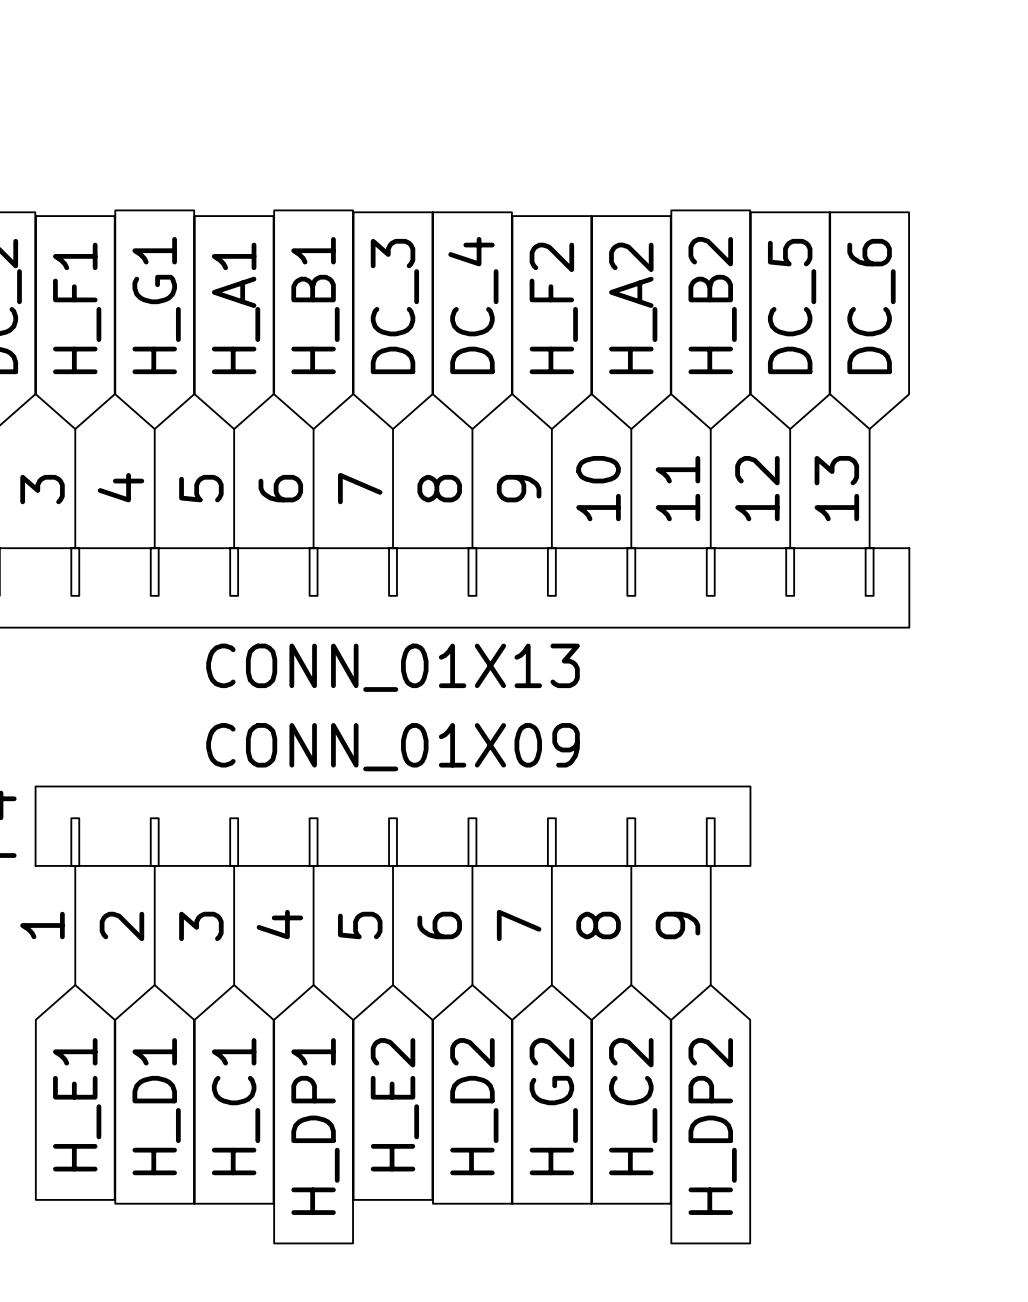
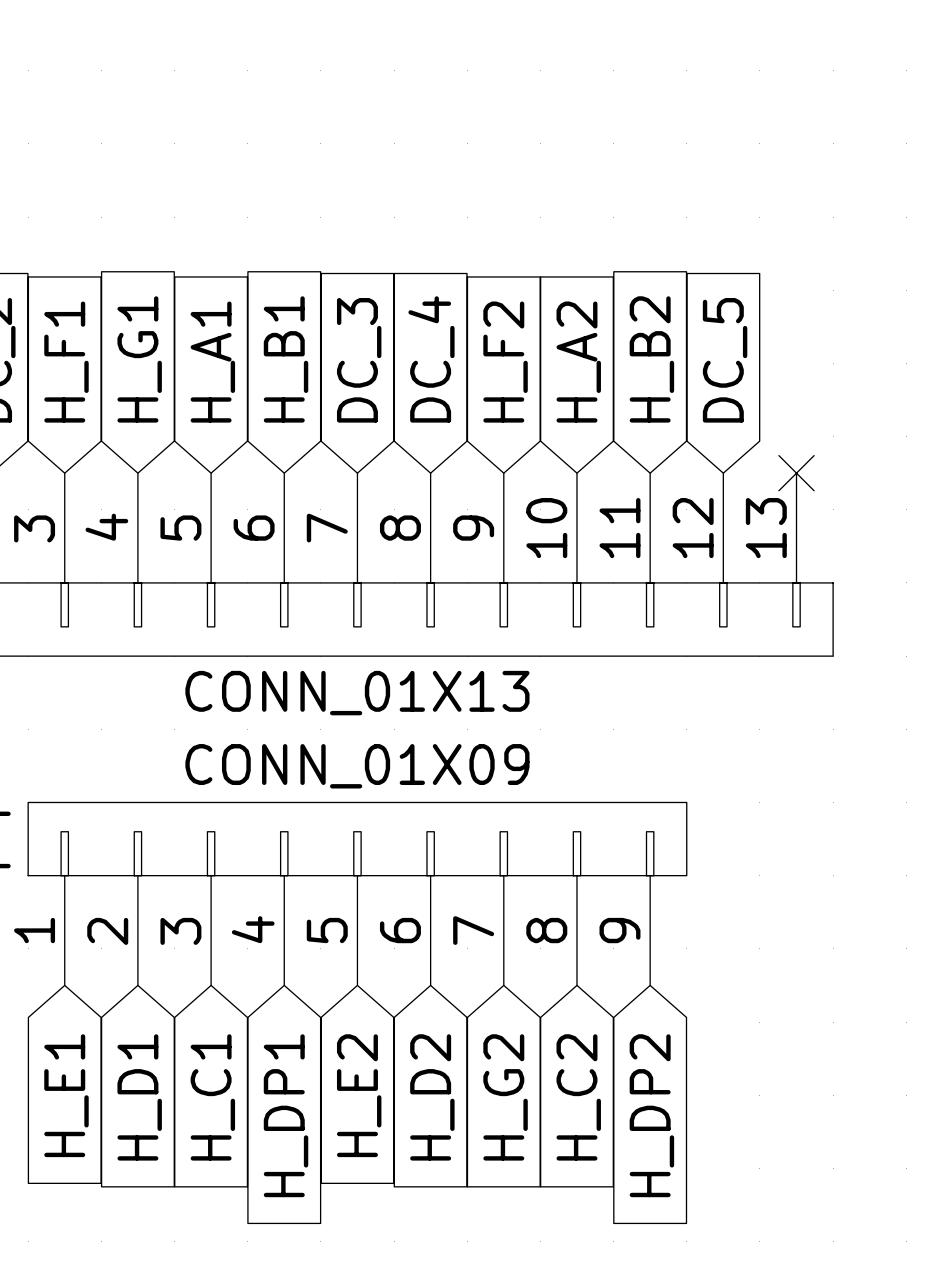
global label: DC_6 (871, 306) -> none
no-connect mark: none -> (796, 473)

